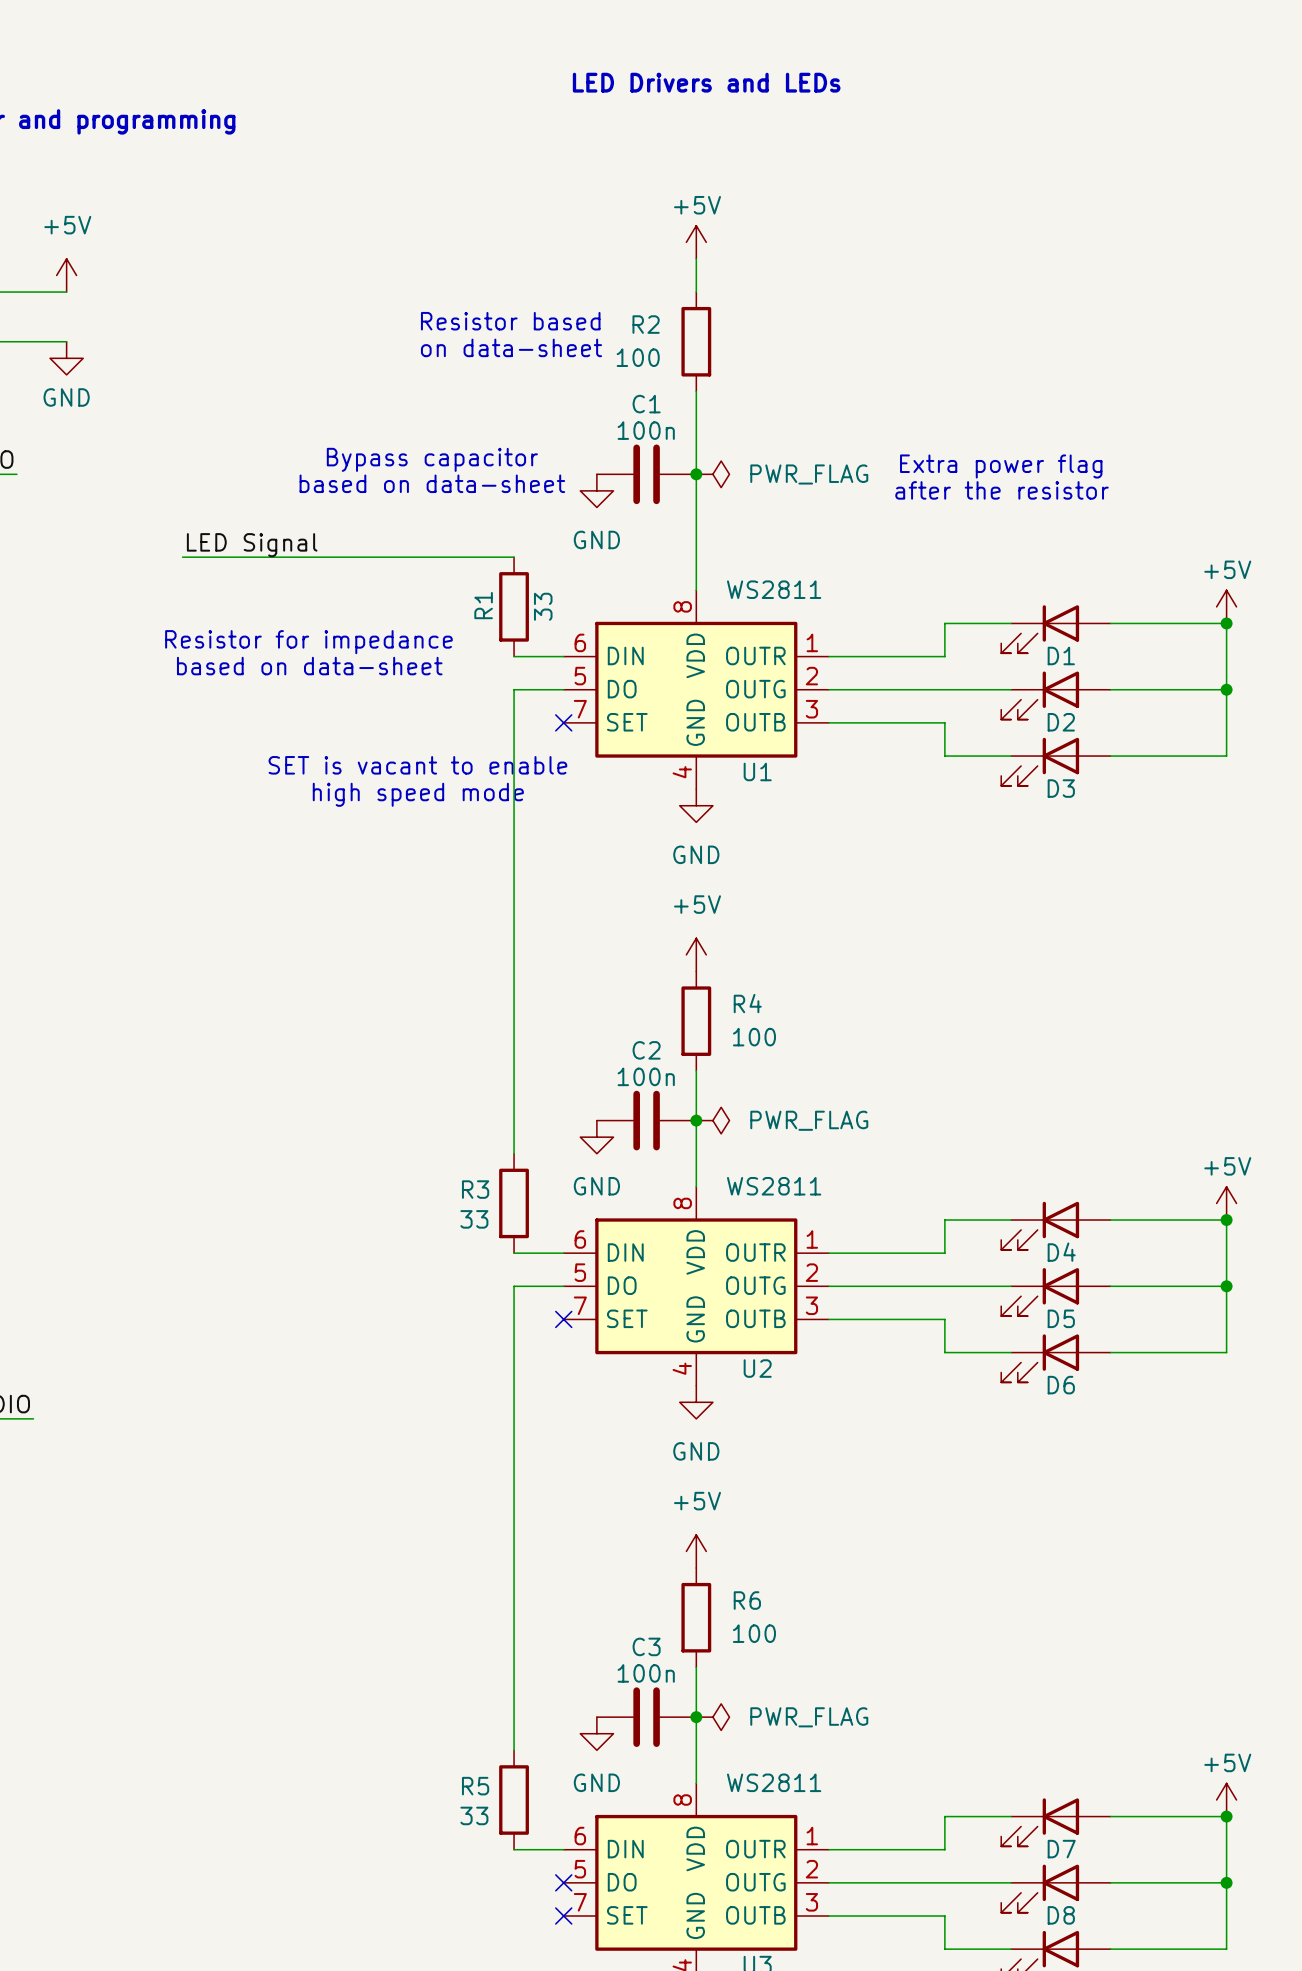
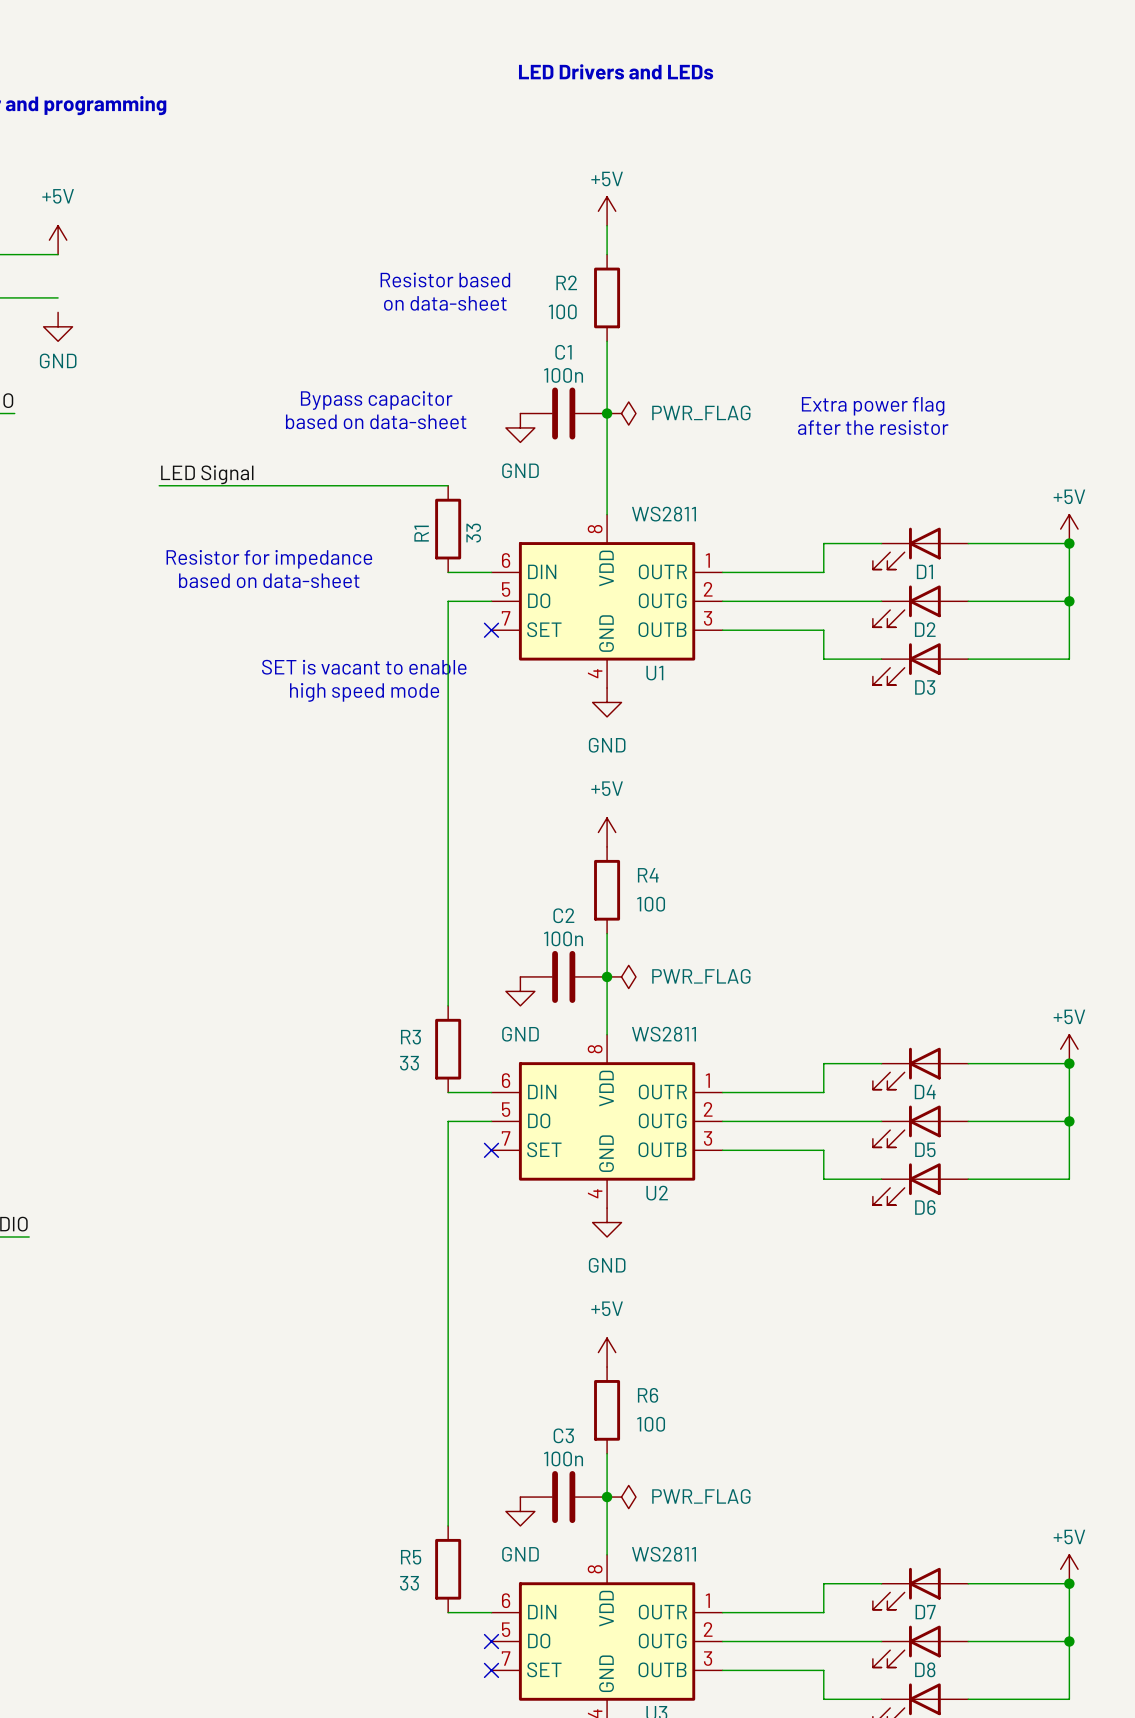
power symbol position: GND (66, 358) -> GND (58, 326)

